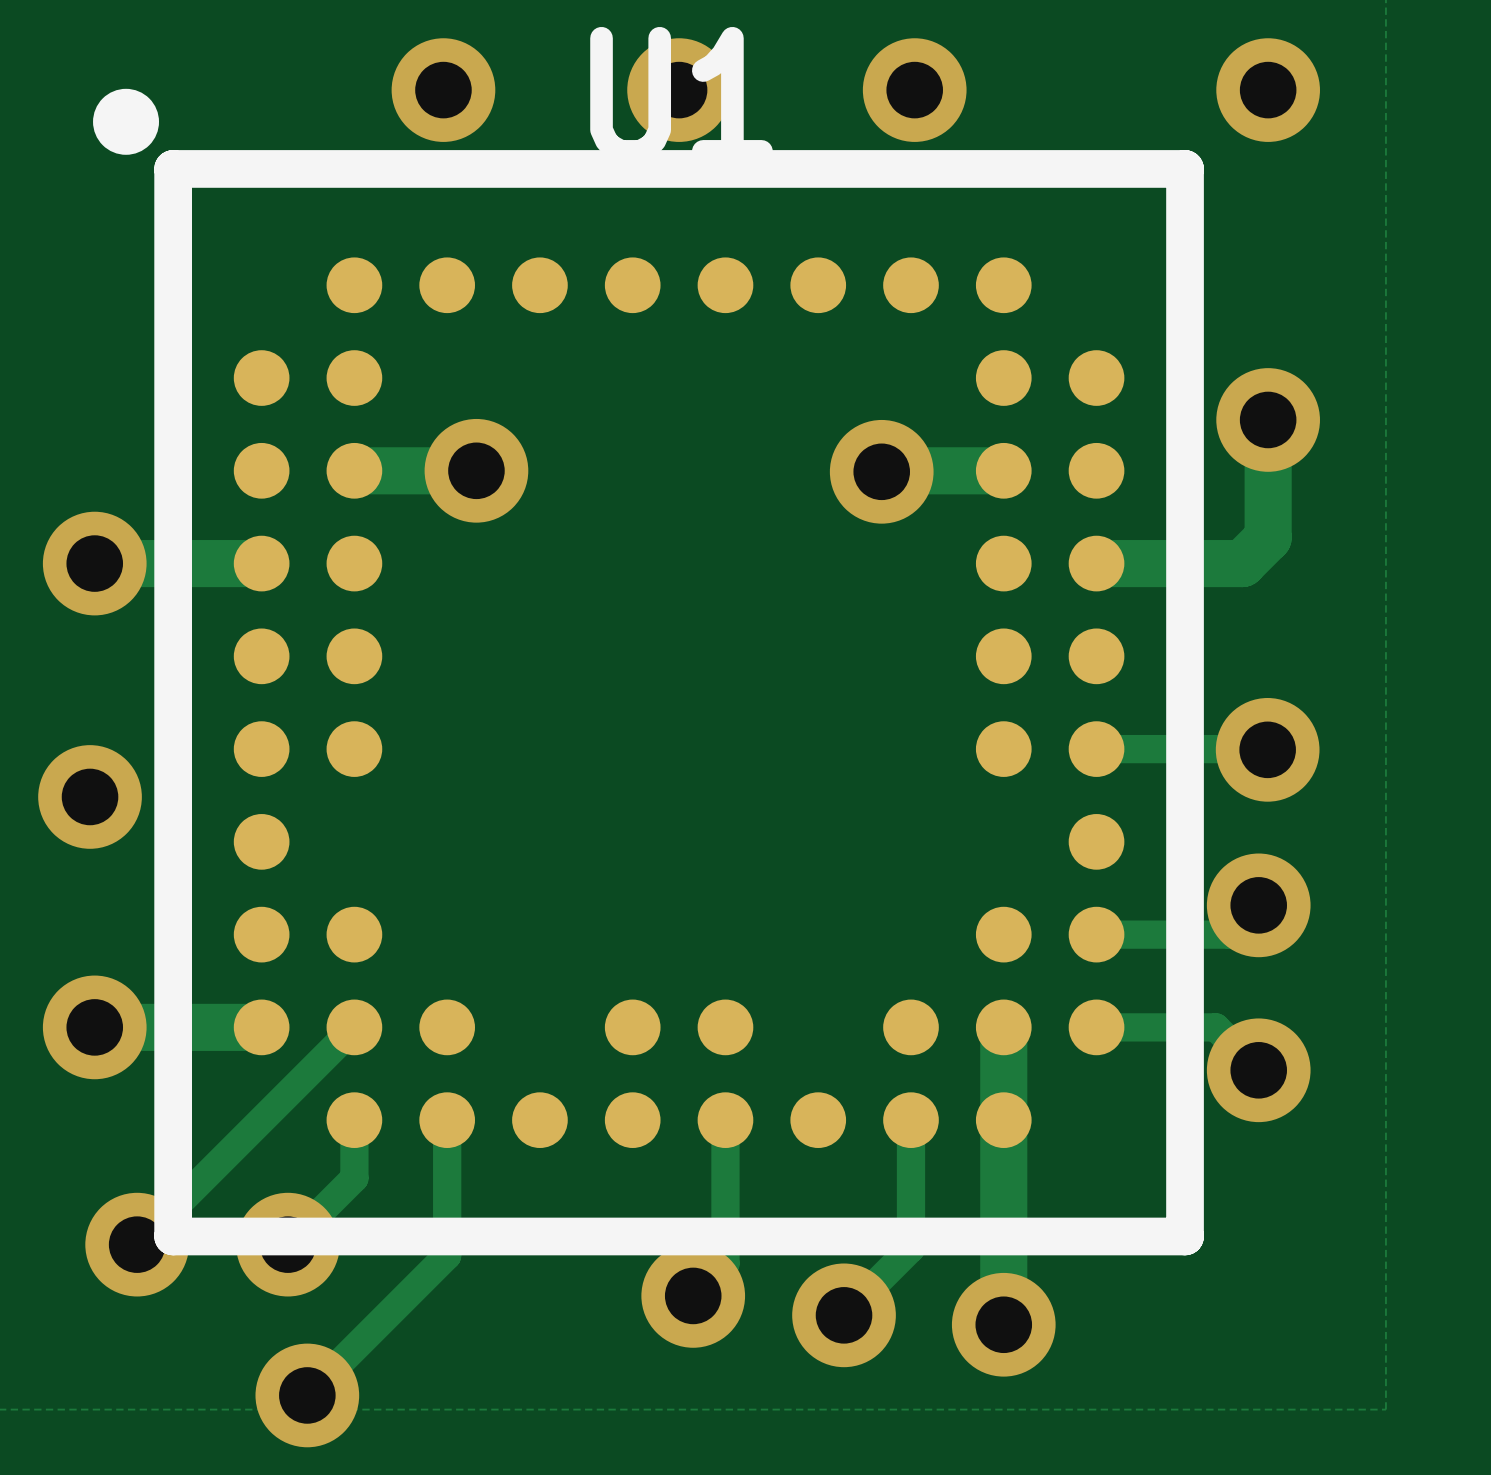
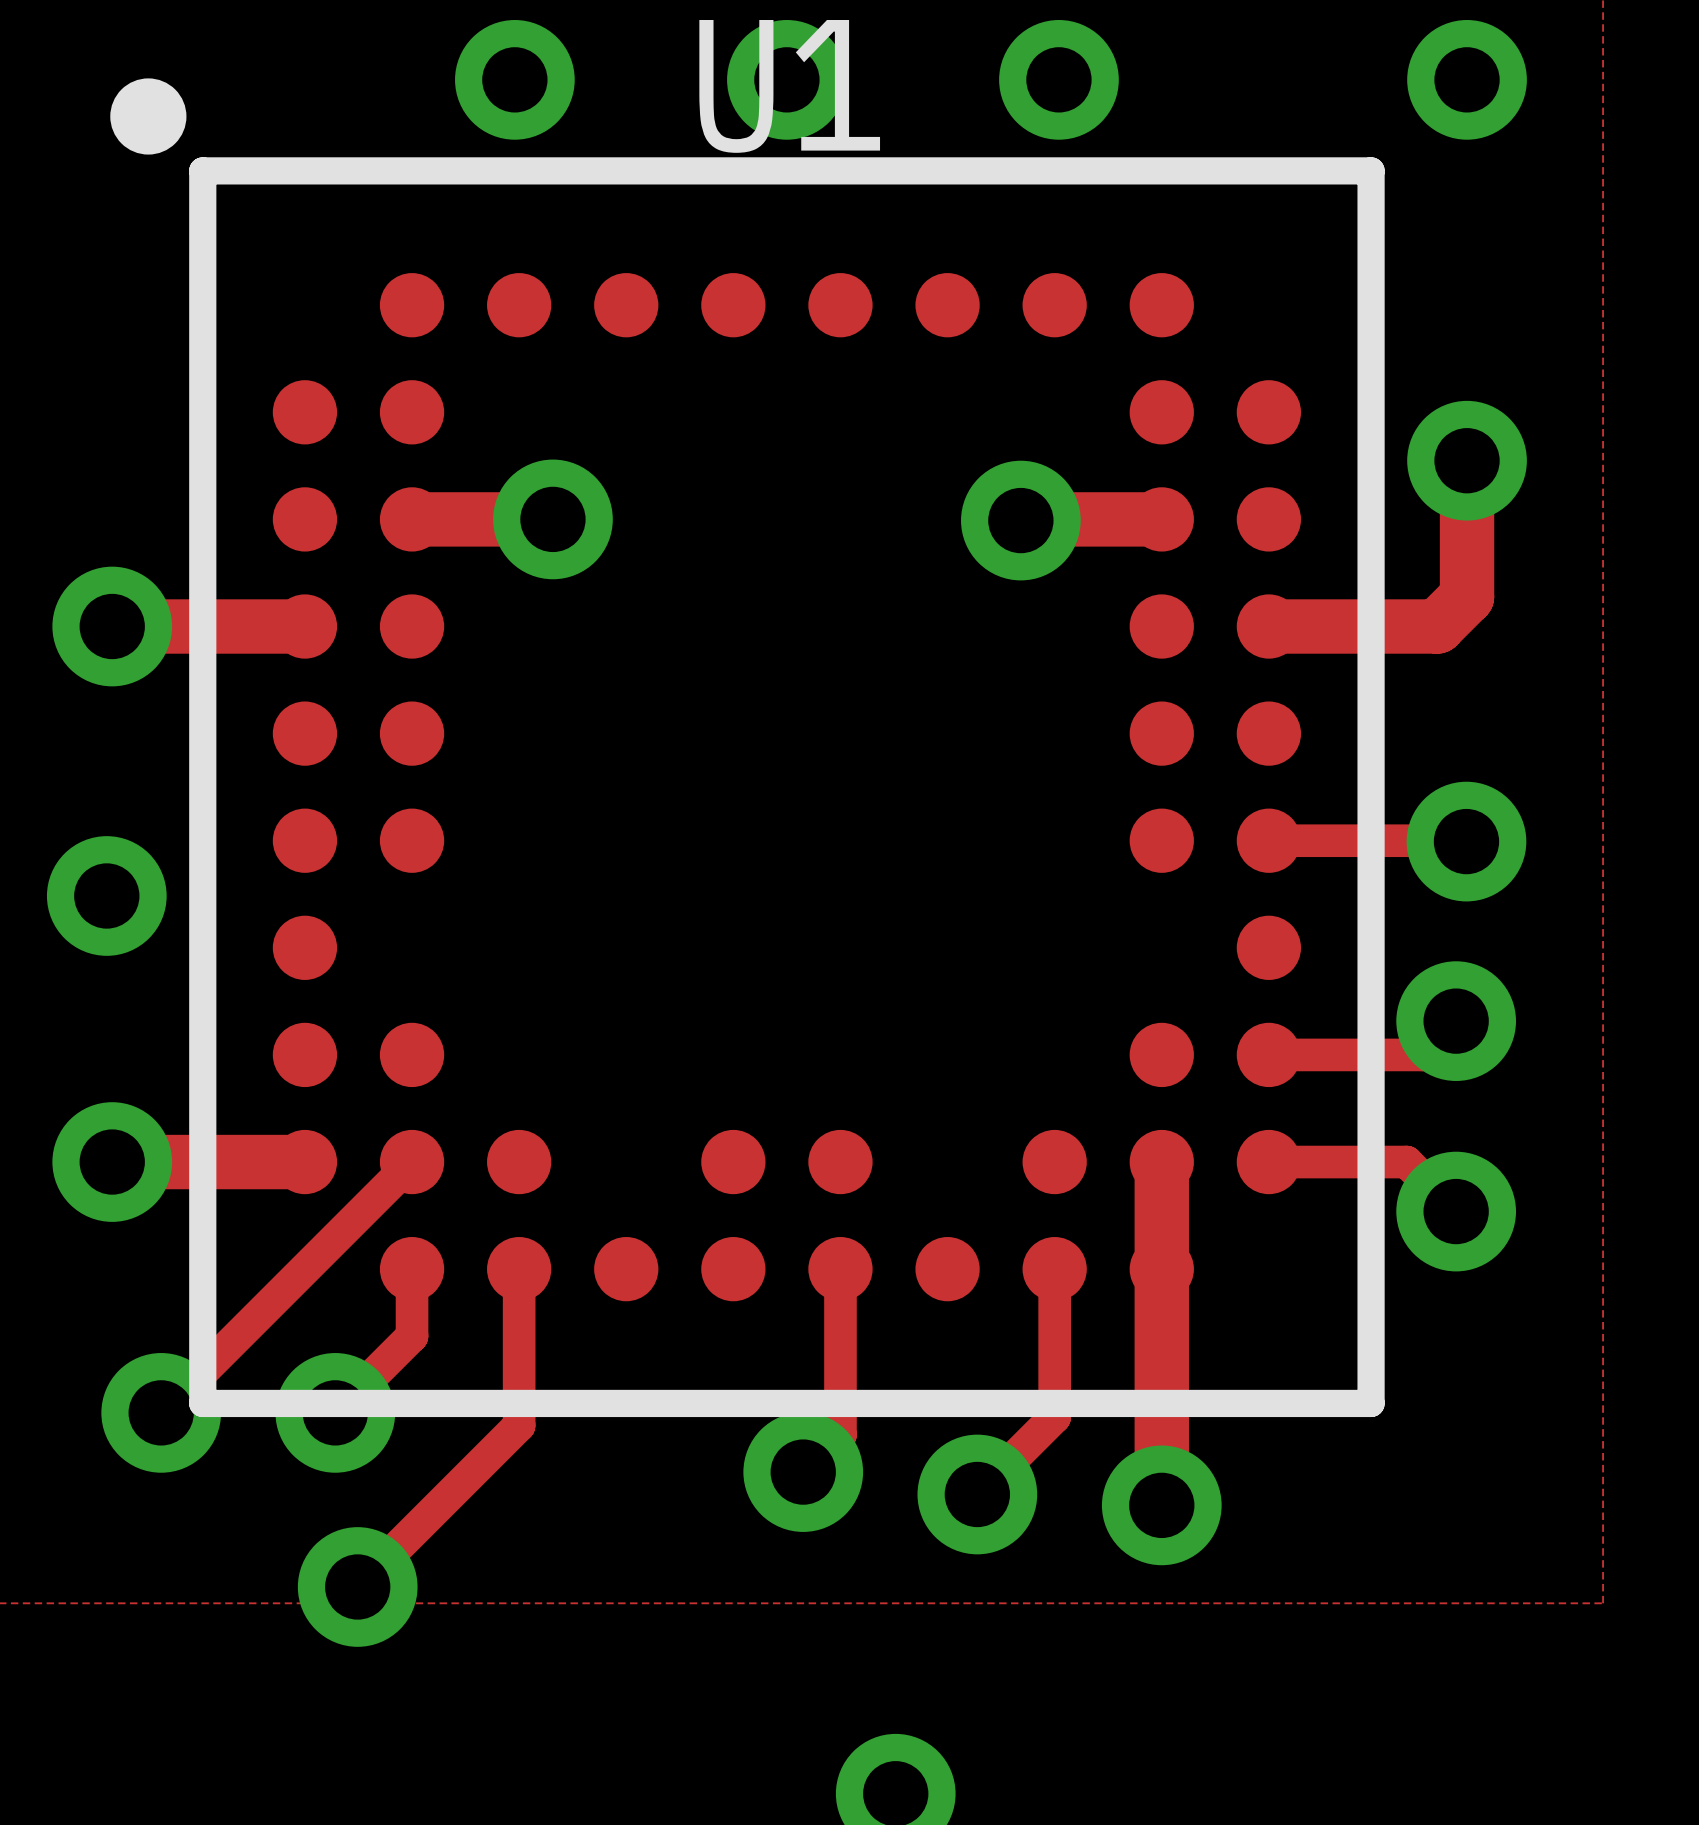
U1 footprint: [93, 88, 1204, 1256] -> [110, 78, 1385, 1418]

